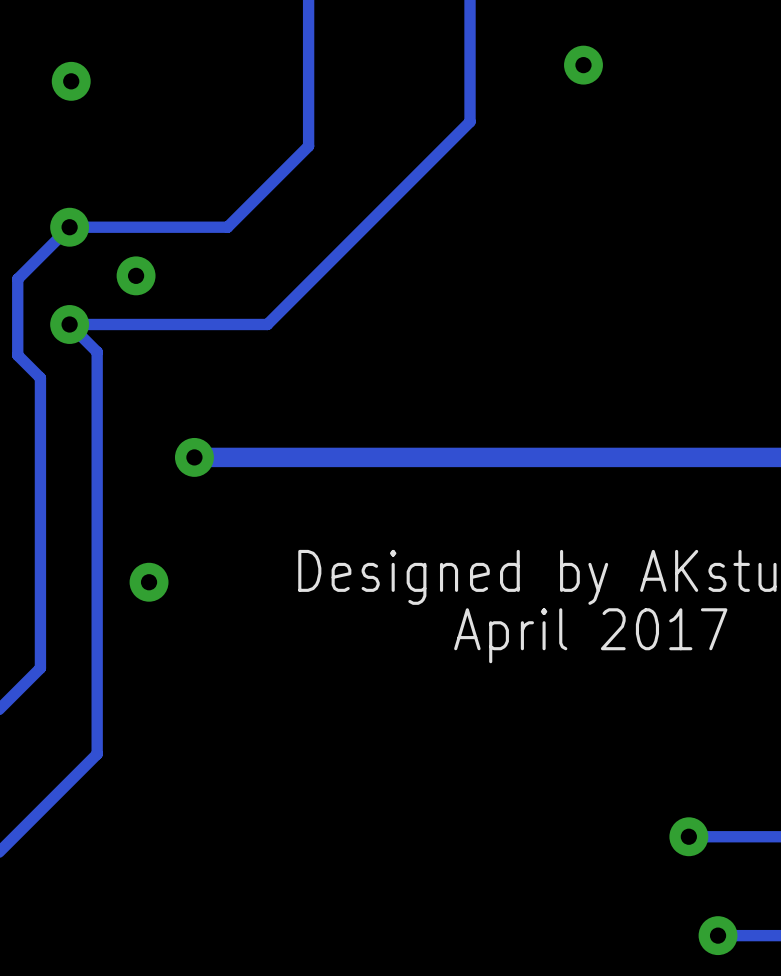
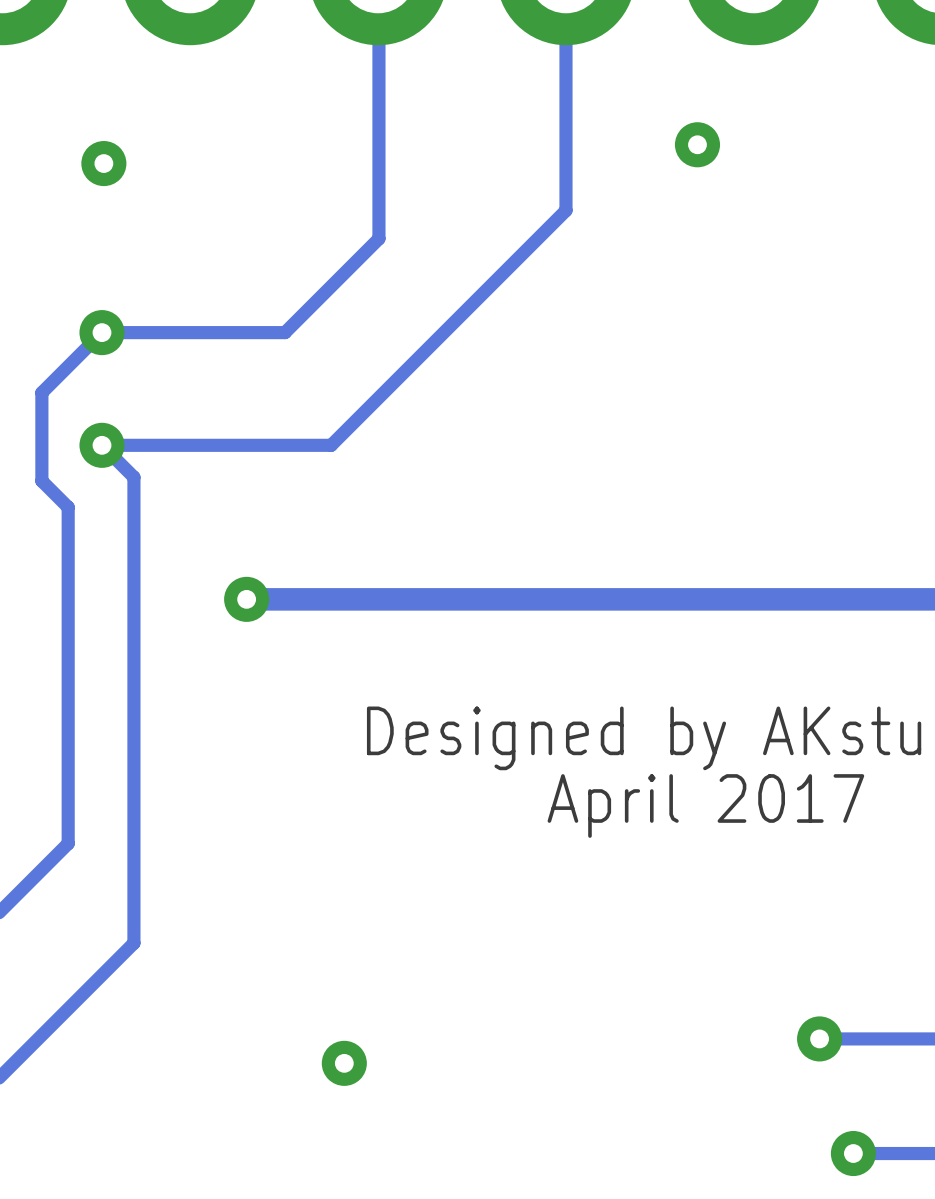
via: (136, 275) -> none
via: (149, 582) -> none
via: none -> (344, 1063)

